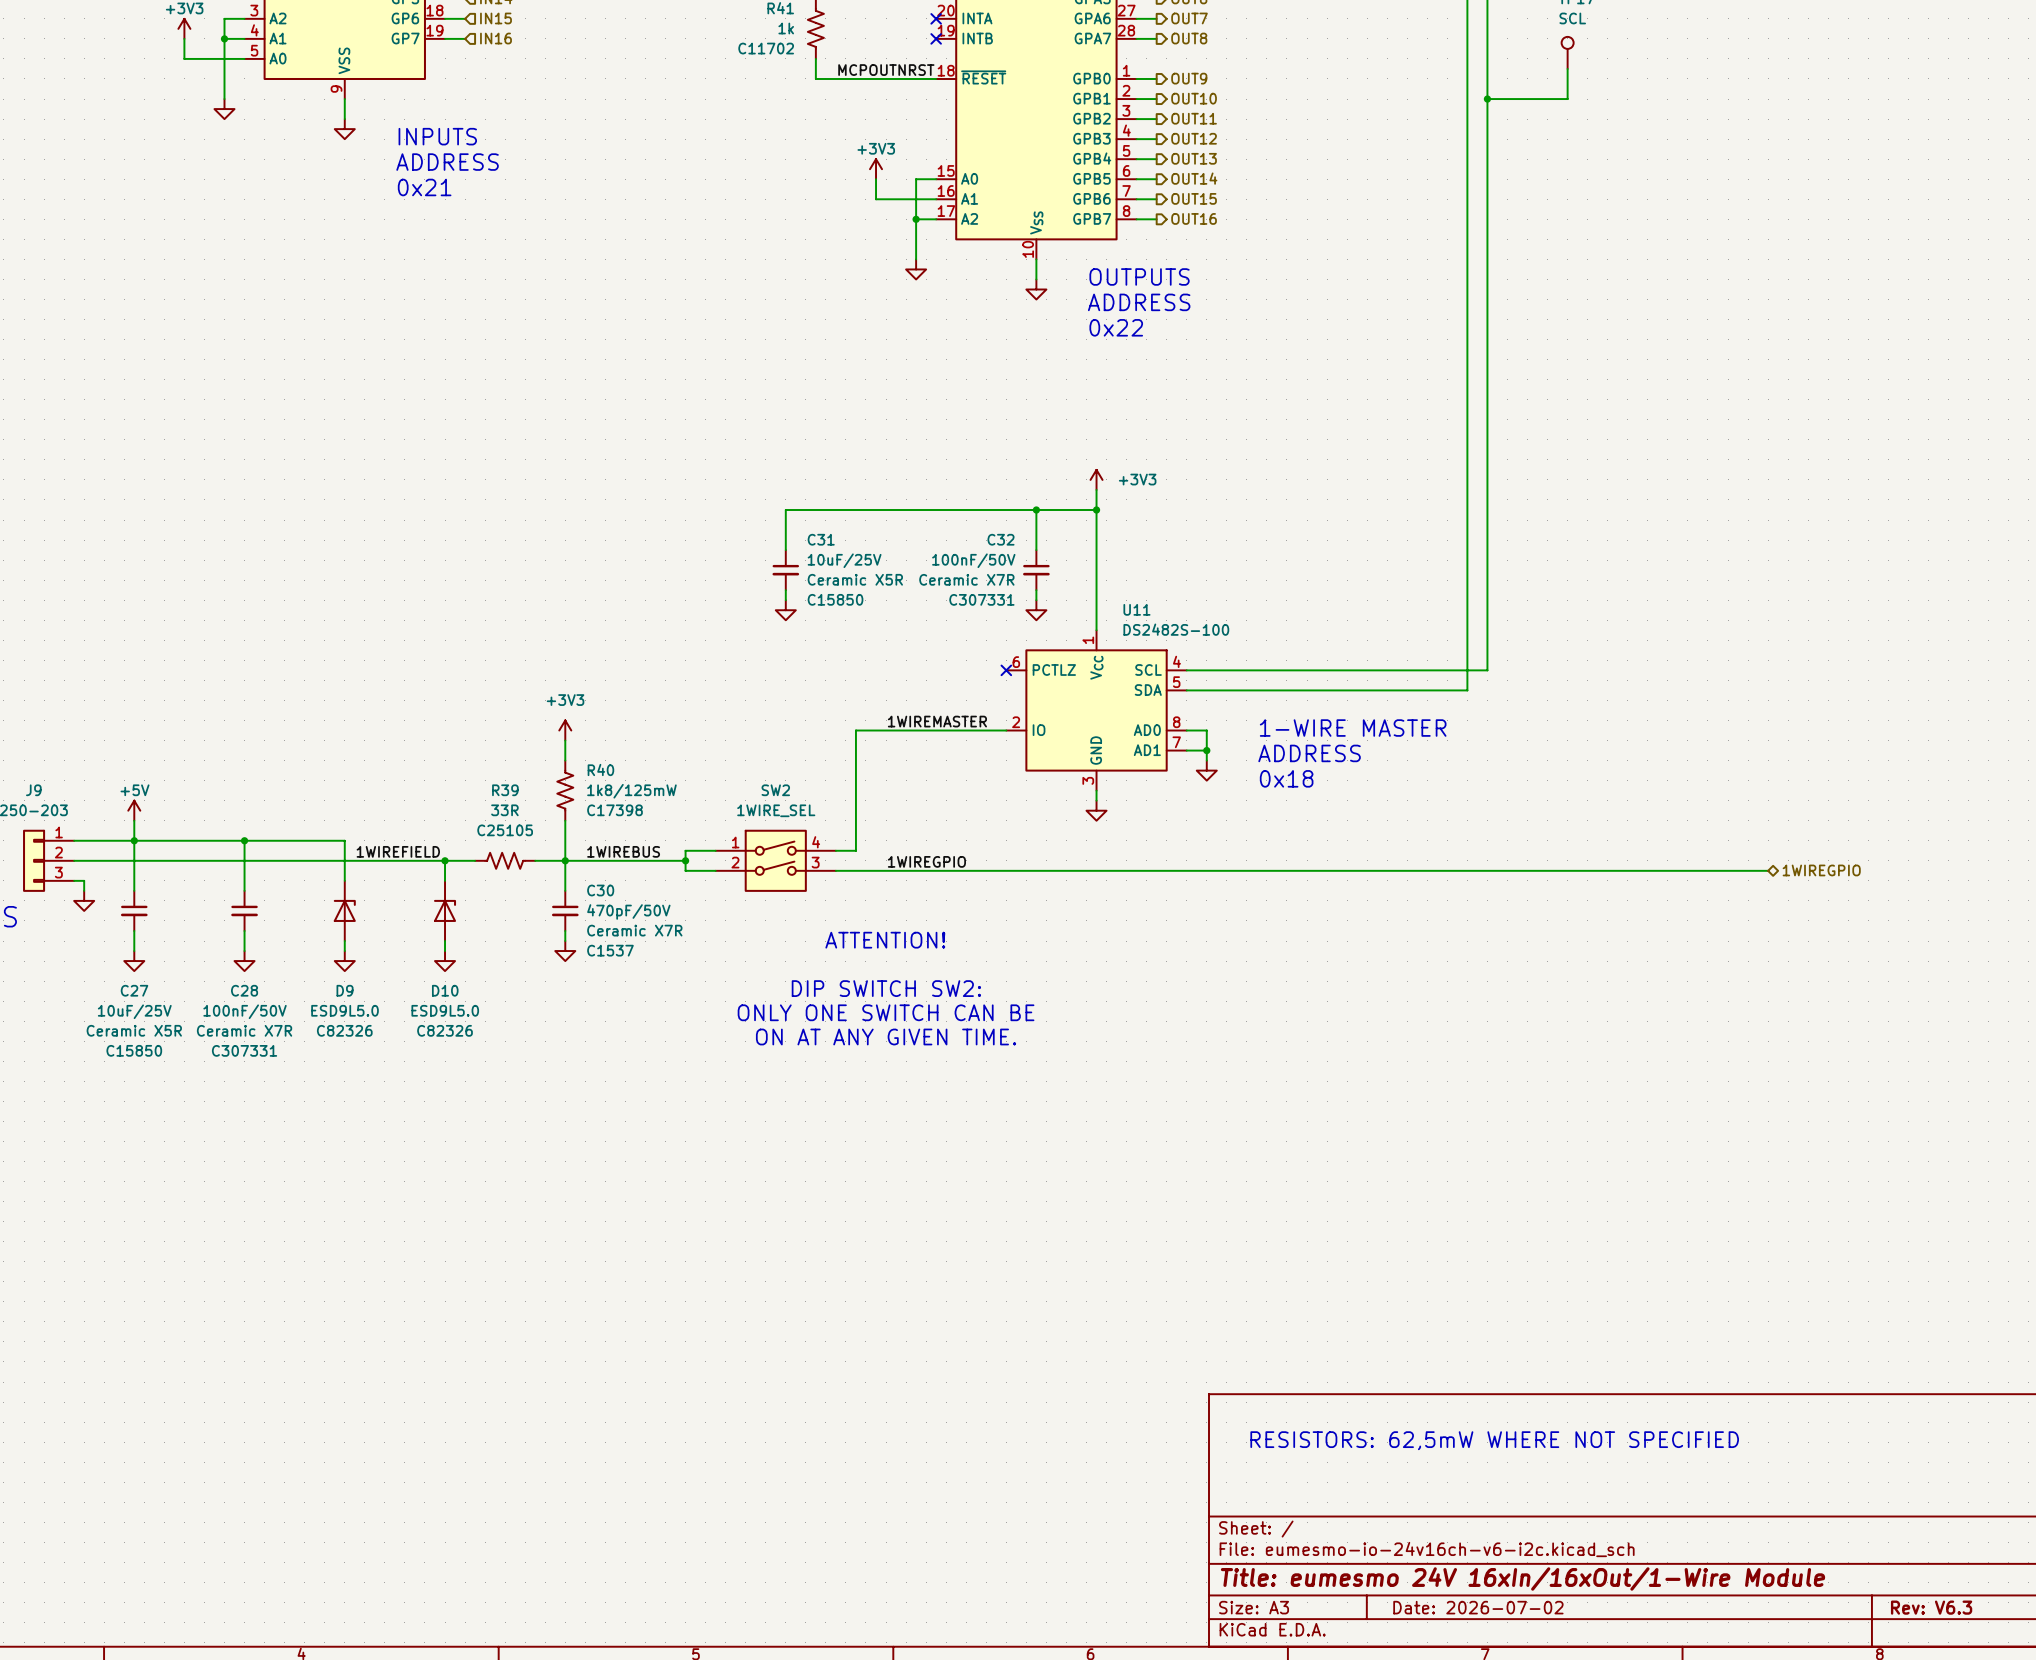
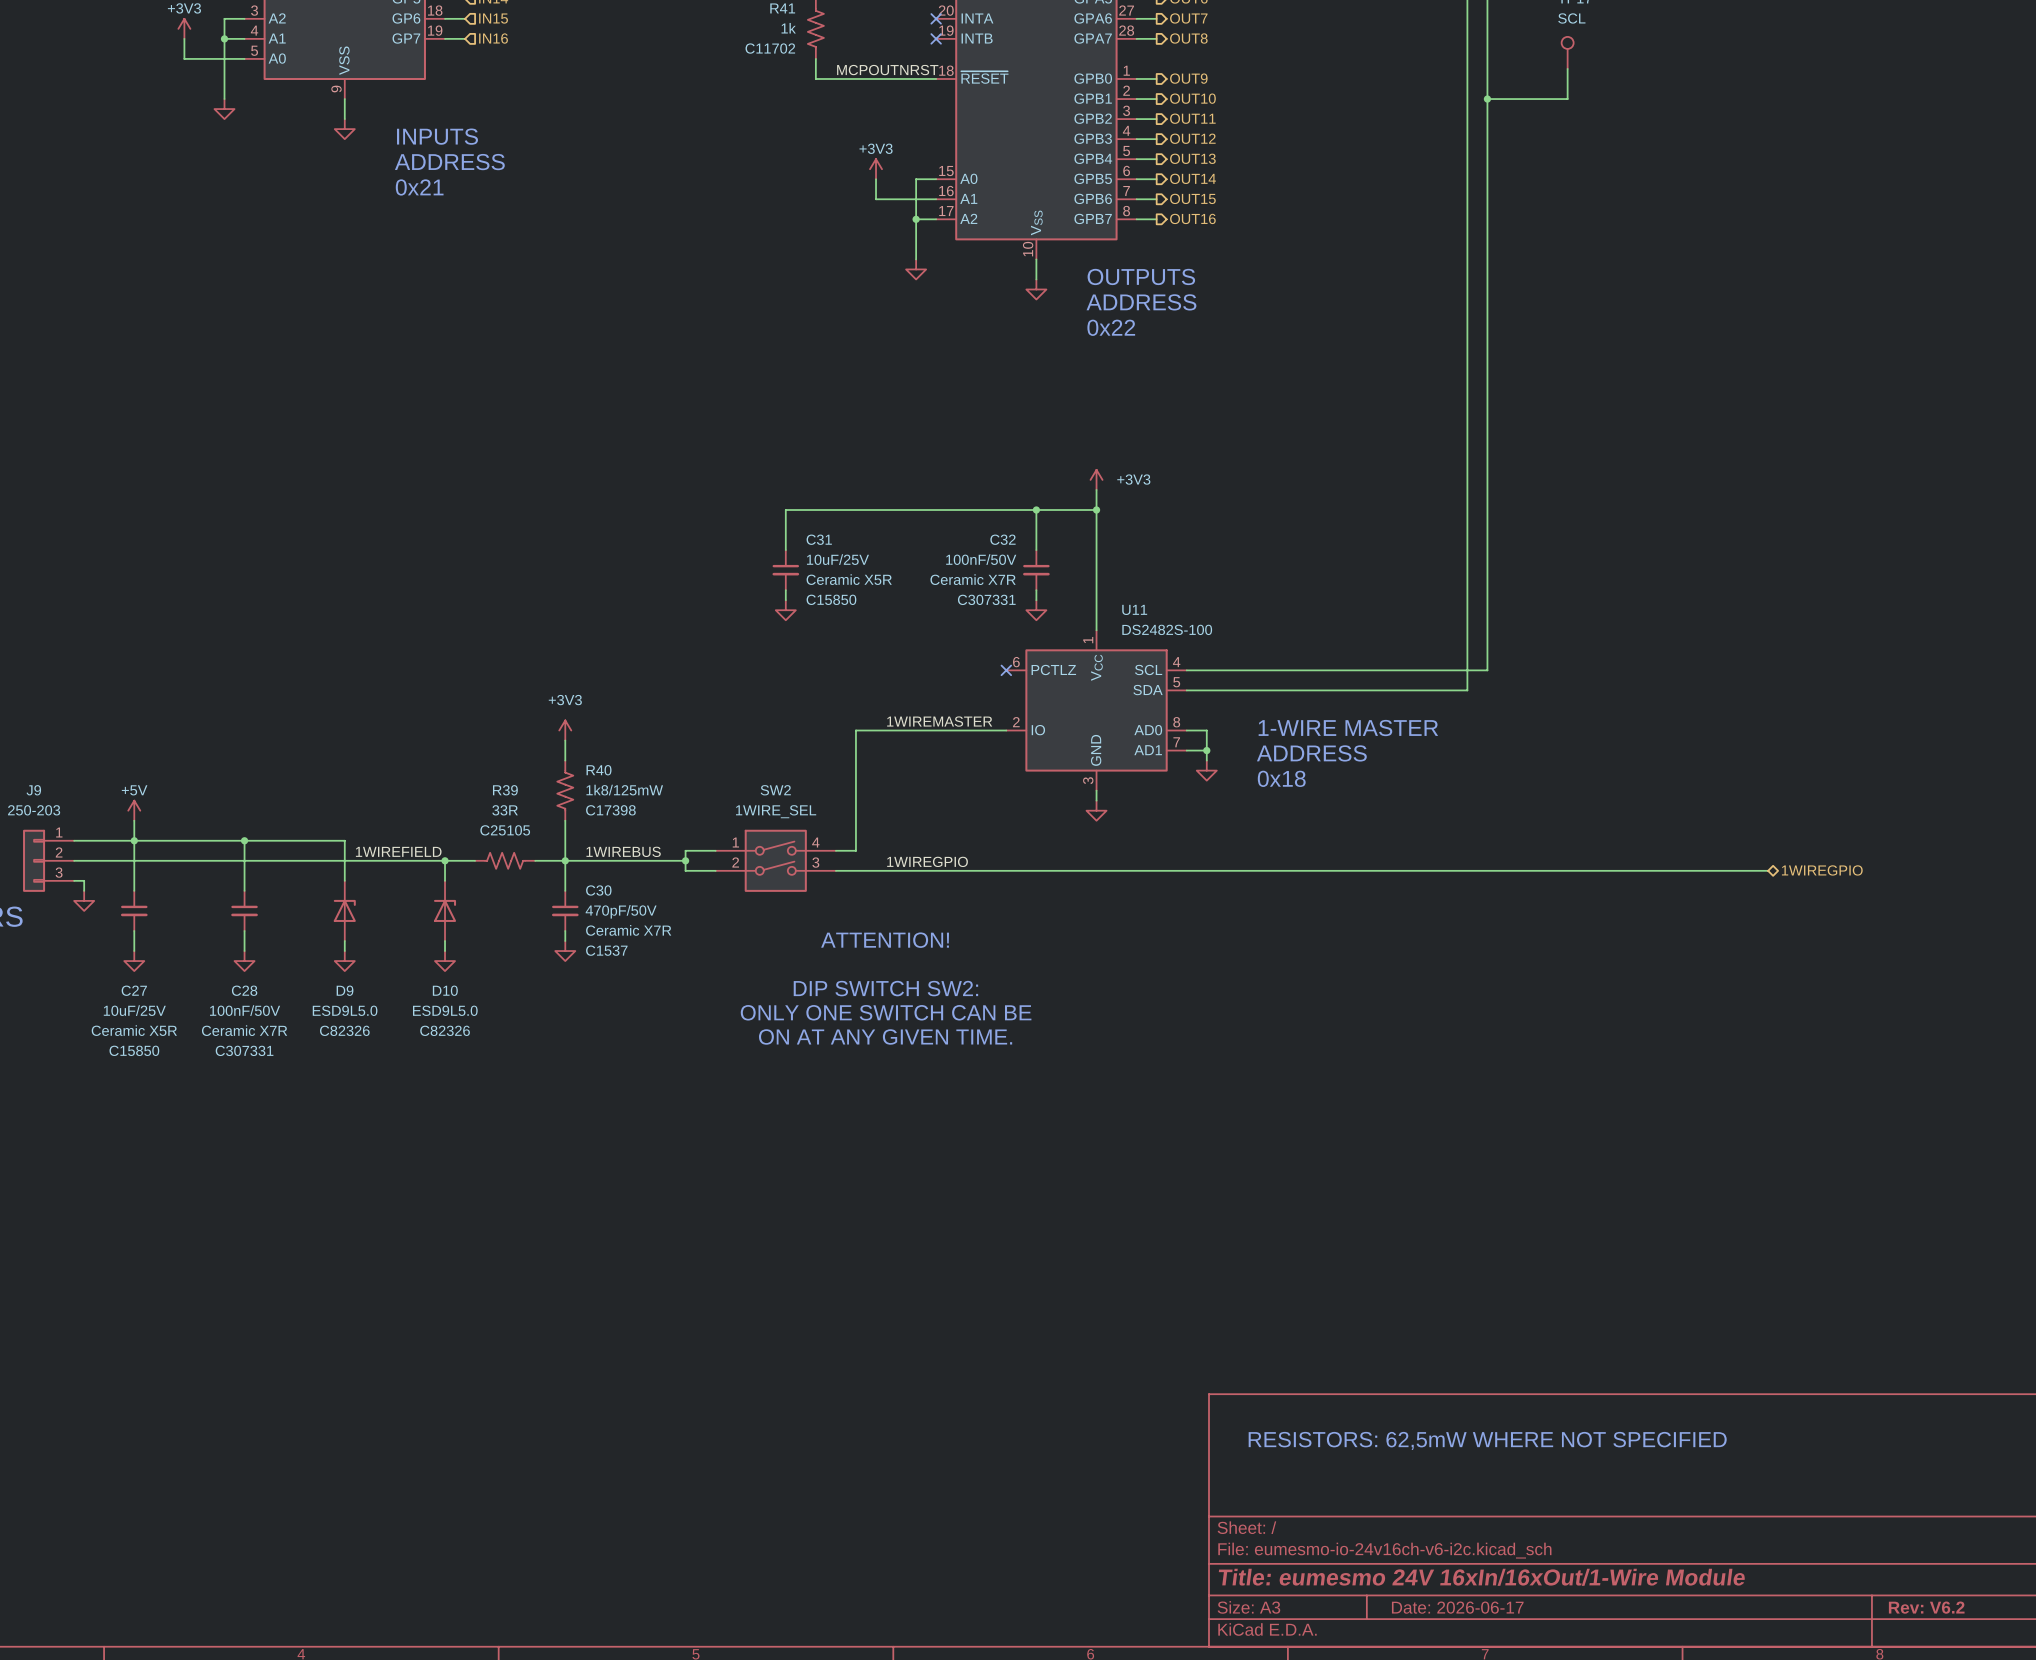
title block: Date: 2026-07-02 (1478, 1607) -> Date: 2026-06-17 (1457, 1607)
title block: Rev: V6.3 (1931, 1607) -> Rev: V6.2 (1926, 1607)

